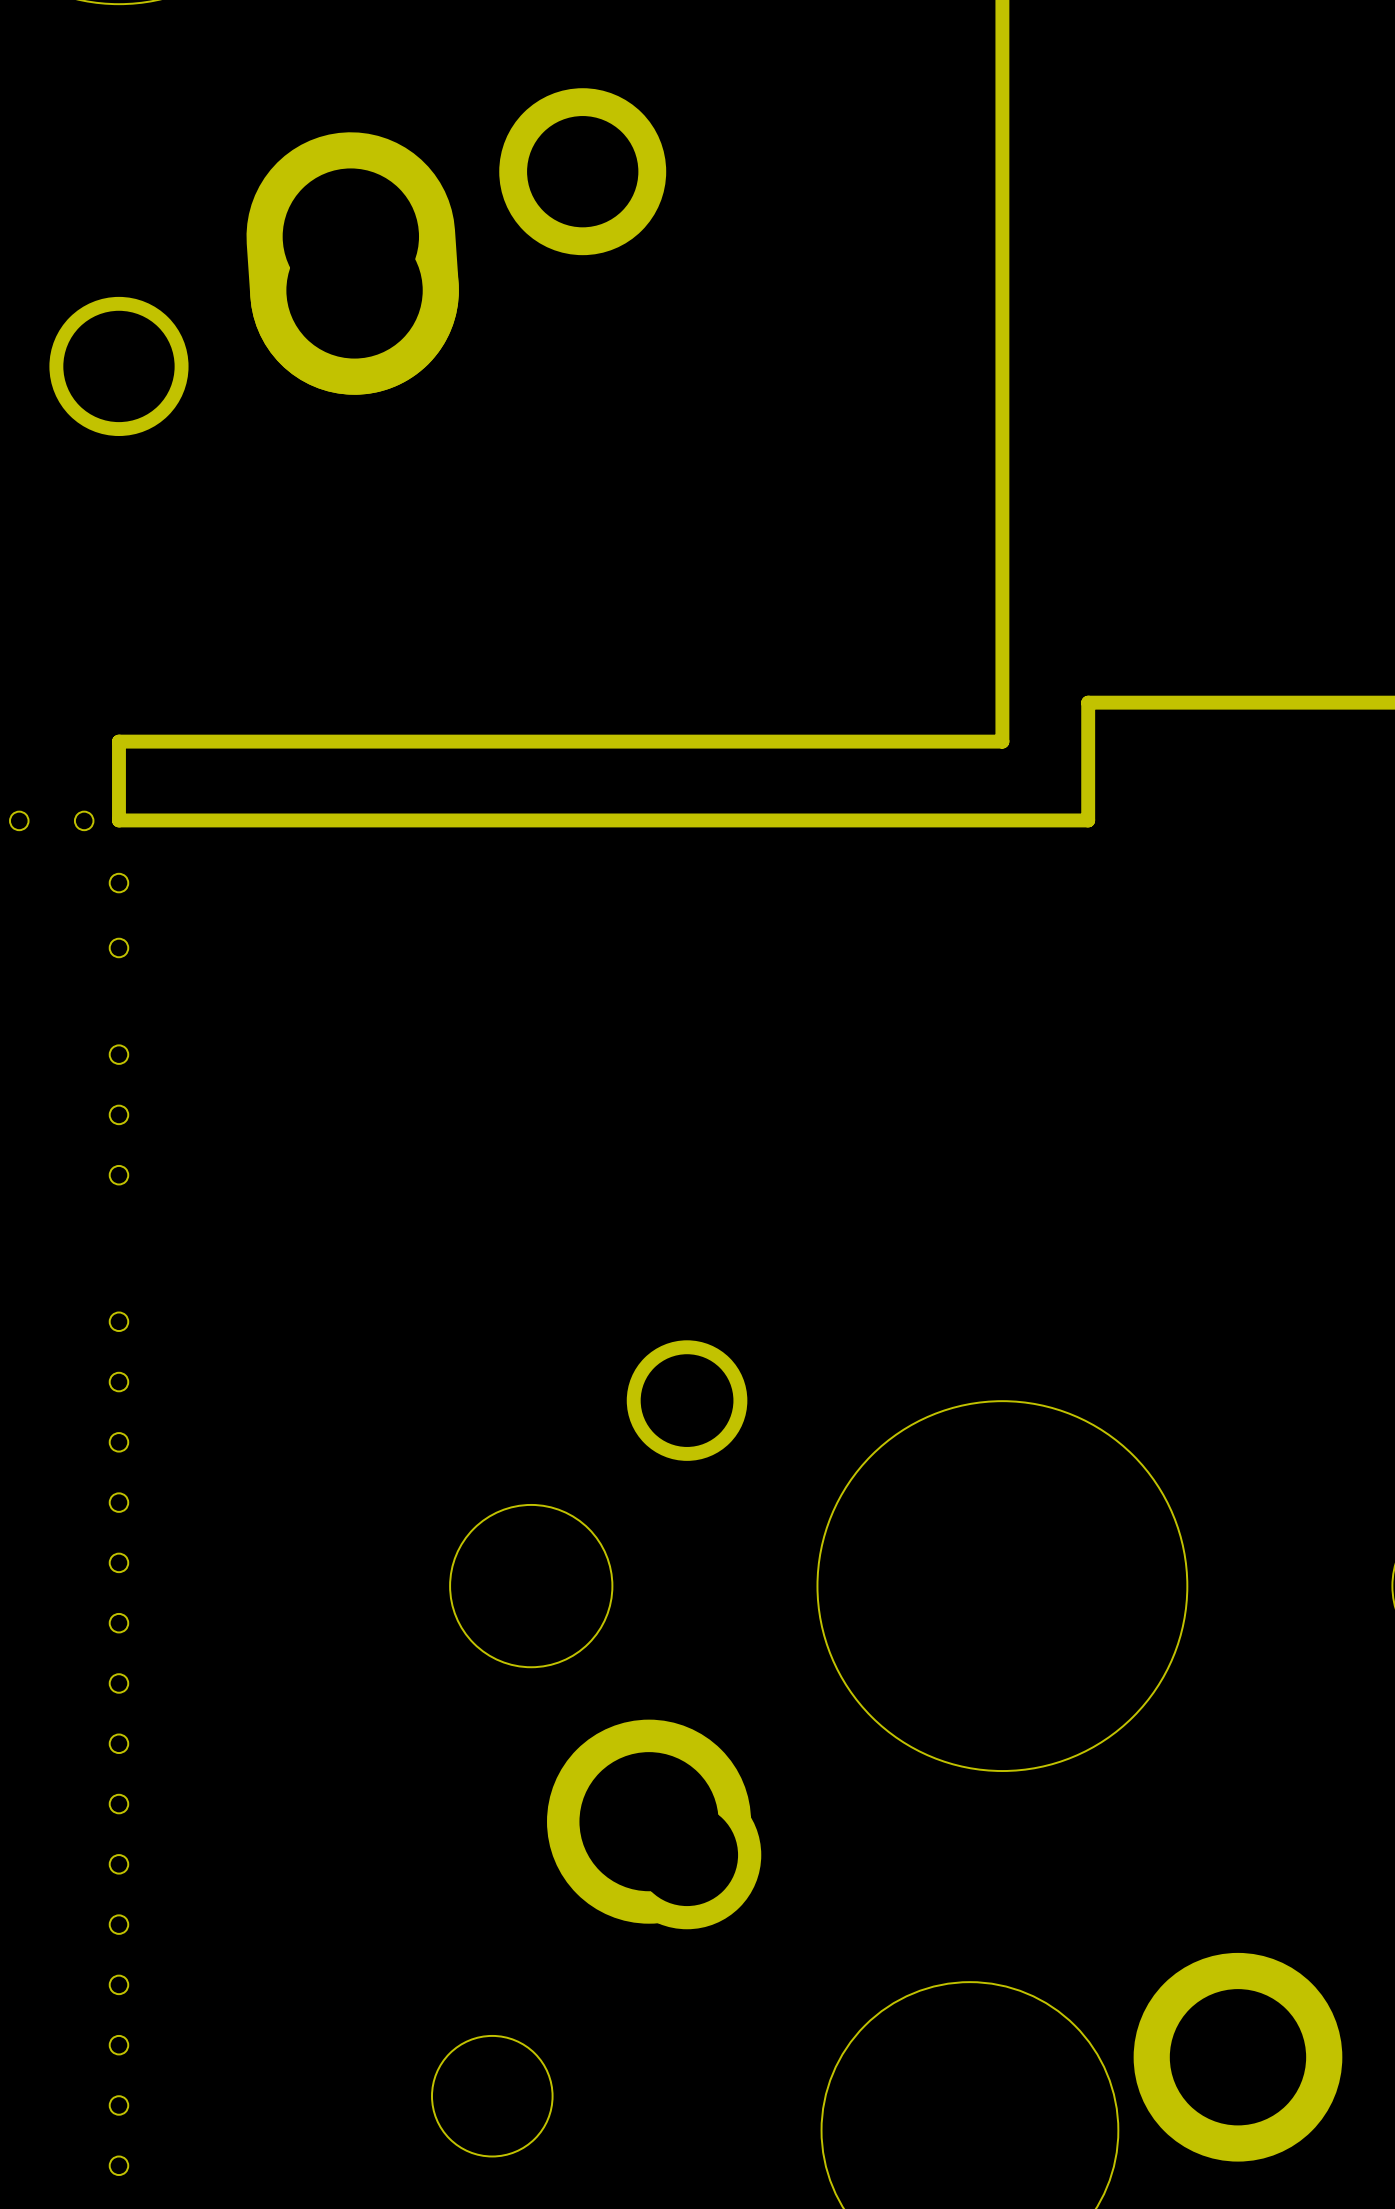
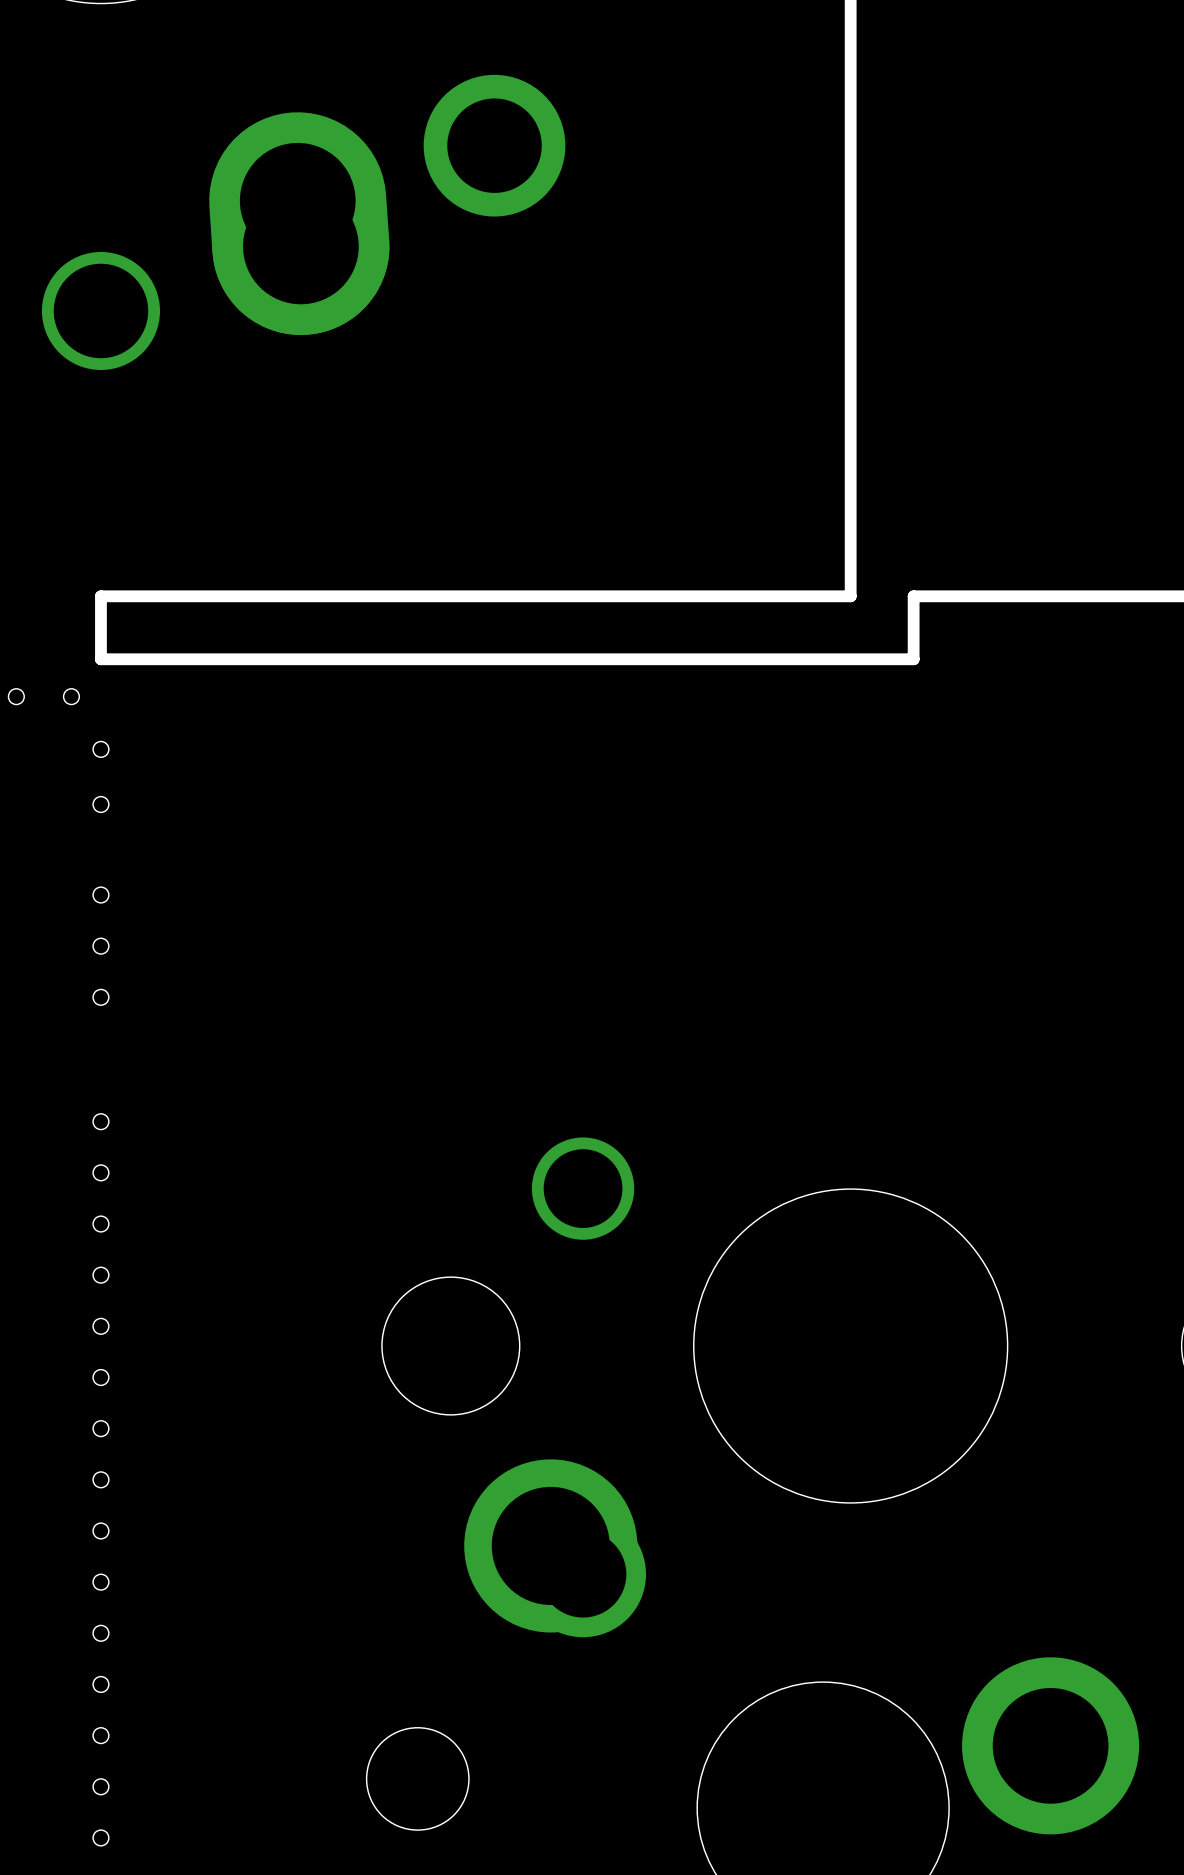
board edge: (1002, 702) (1002, 741) (118, 741) -> (850, 596) (100, 596) (100, 629)
board edge: (1088, 702) (1088, 820) (118, 820) (118, 776) -> (923, 596) (913, 596) (913, 659) (100, 659)

